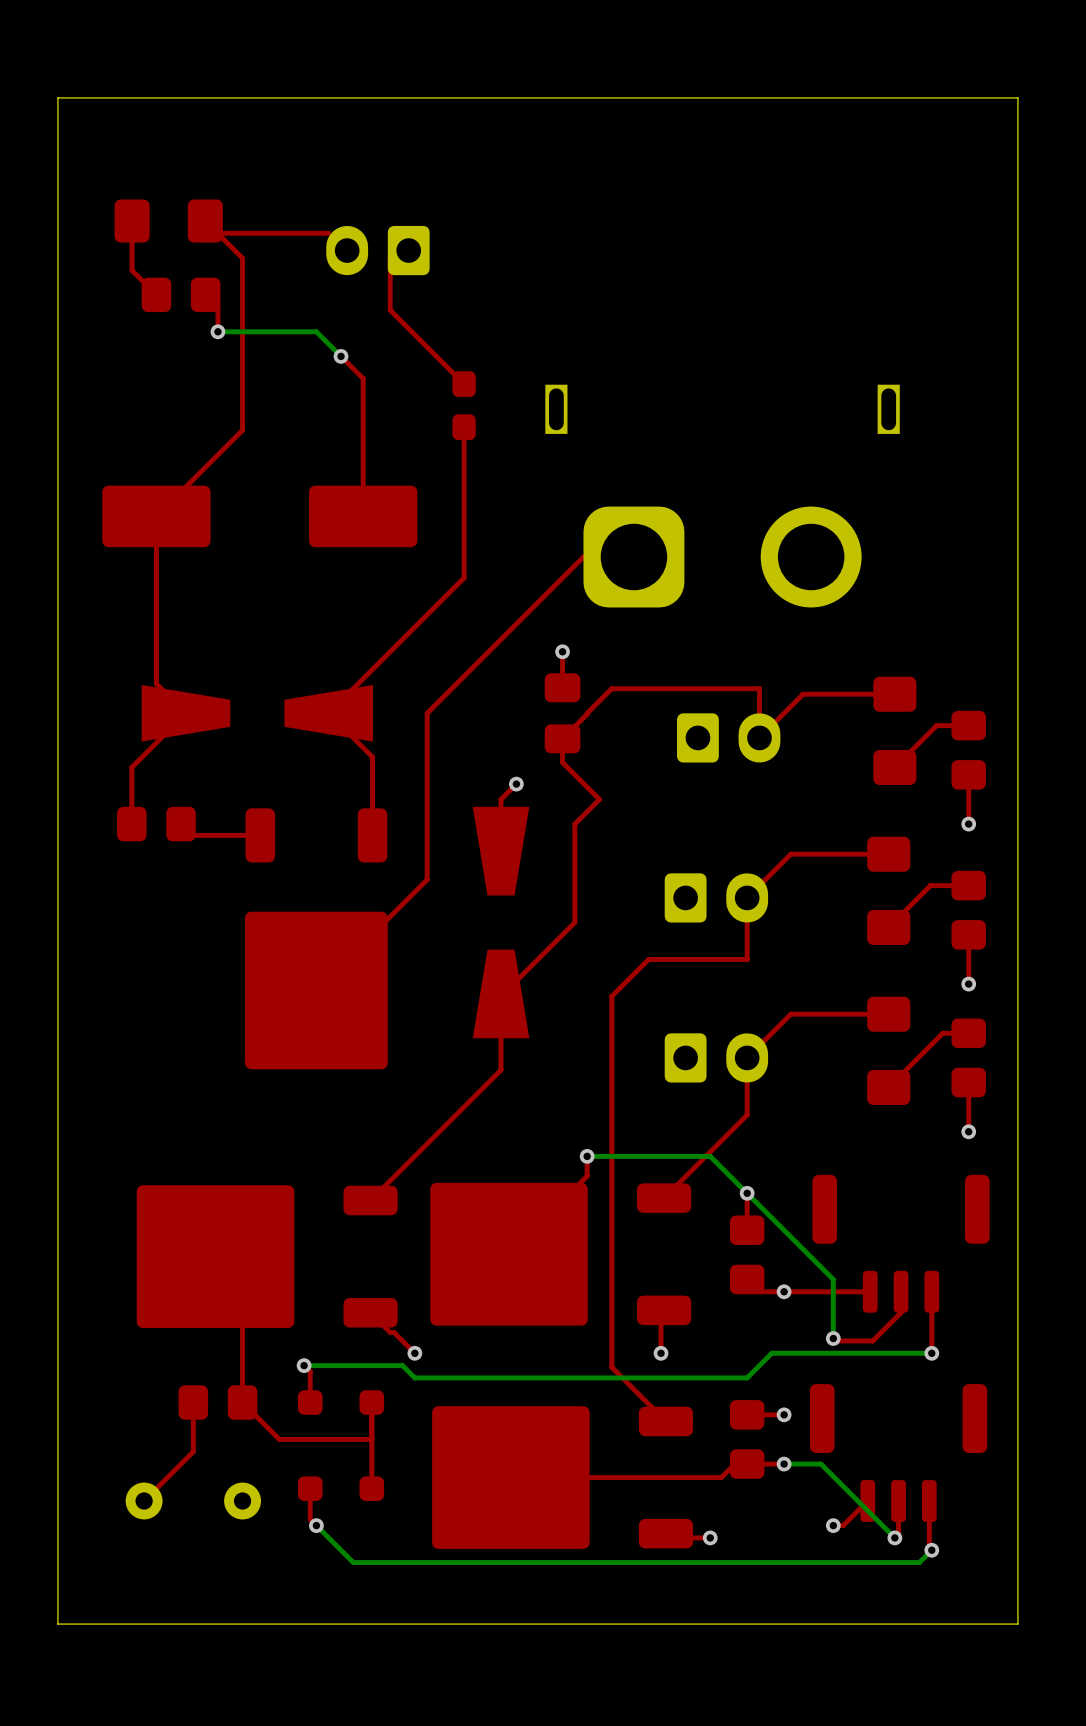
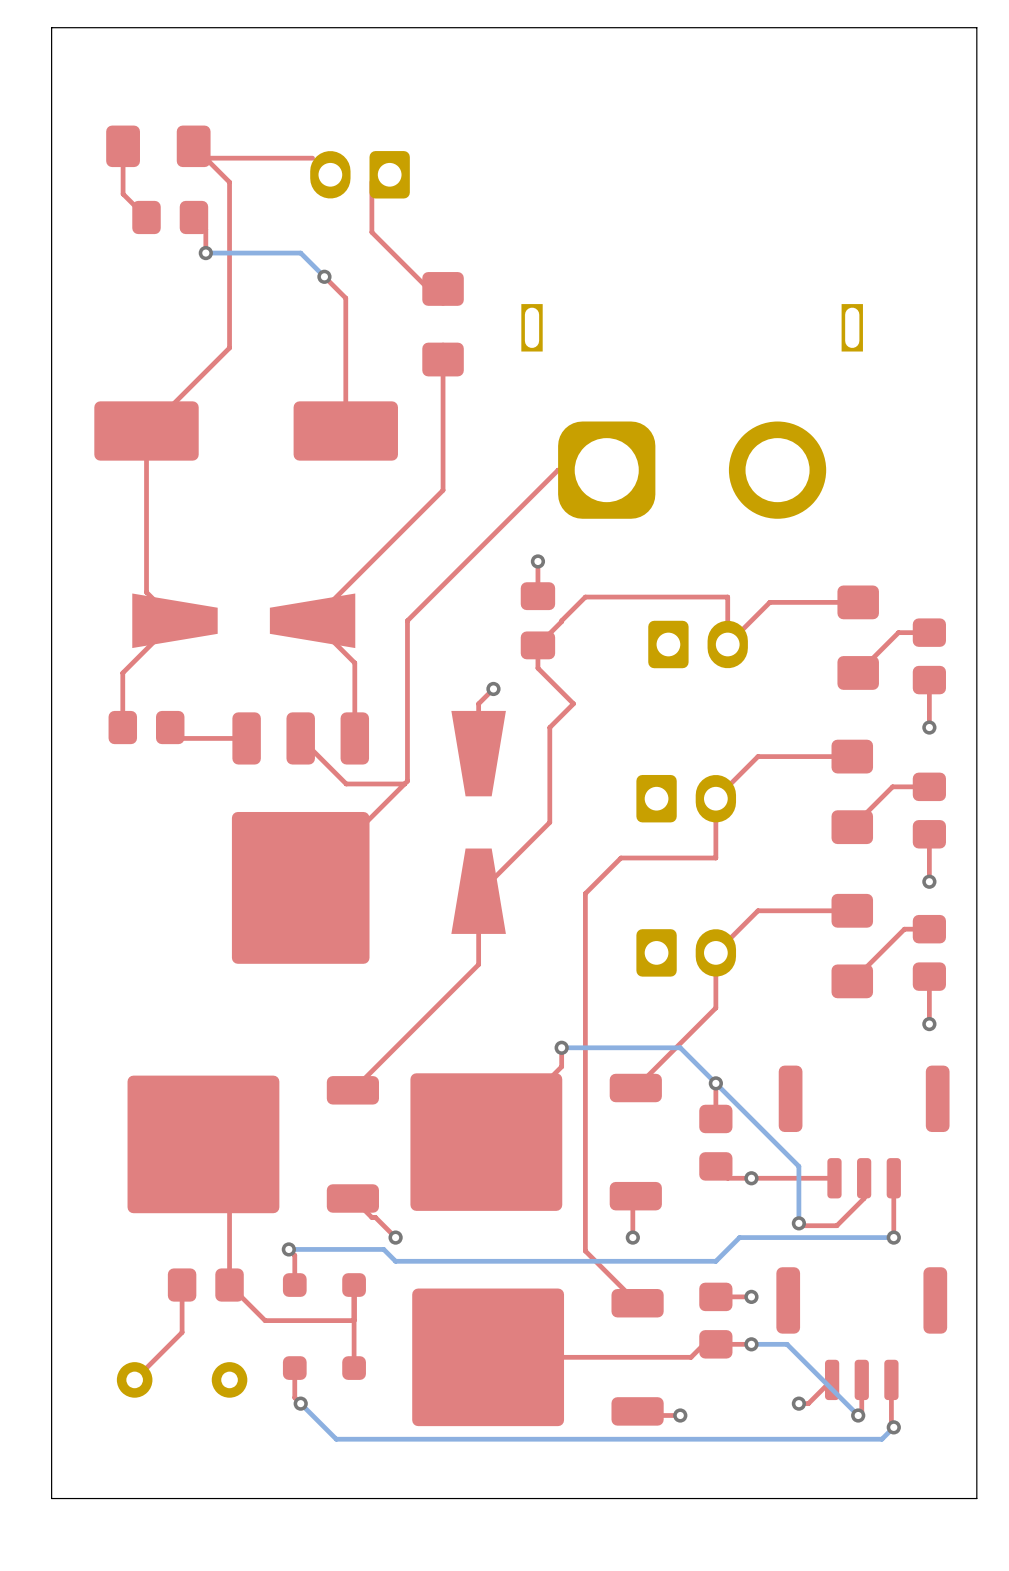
part footprint: [452, 371, 476, 441] -> [422, 272, 464, 377]
part footprint: [245, 808, 388, 1070] -> [231, 712, 370, 964]
top track: none -> (300, 738) (346, 783) (404, 783)

